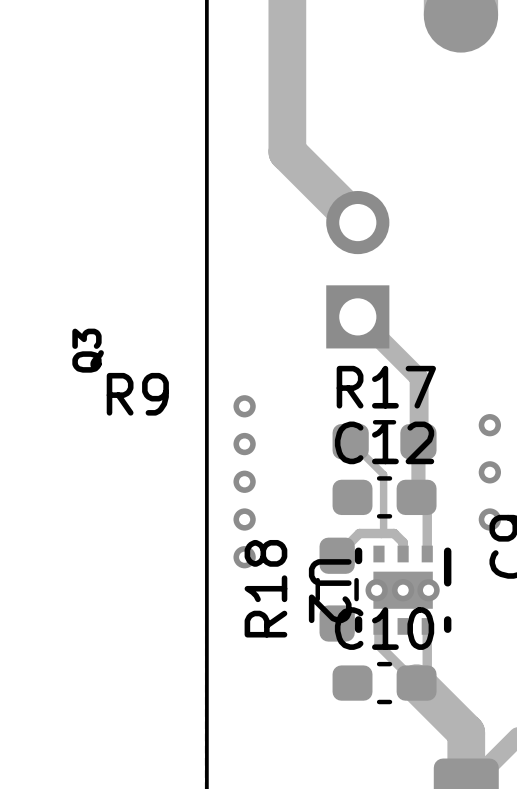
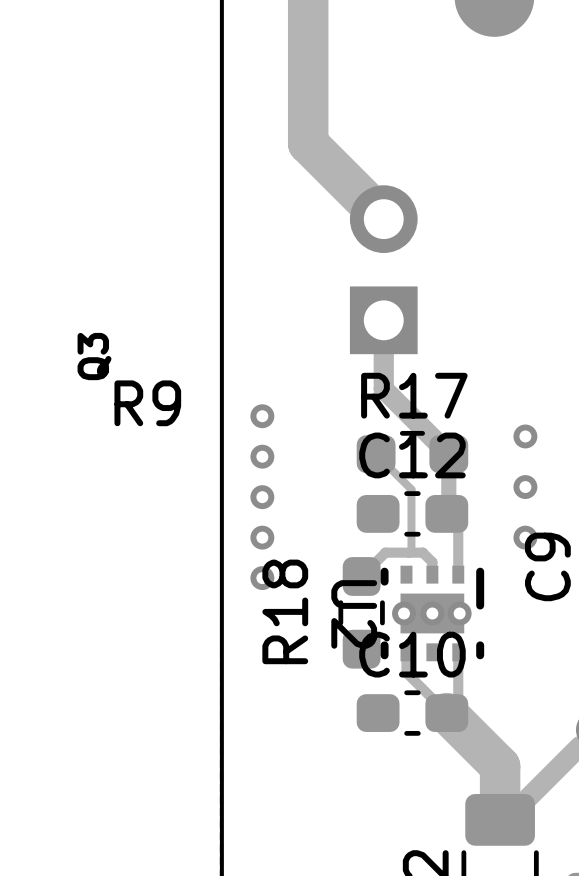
track: (357, 316) (419, 378) (418, 441) -> (383, 320) (383, 389) (448, 454)

